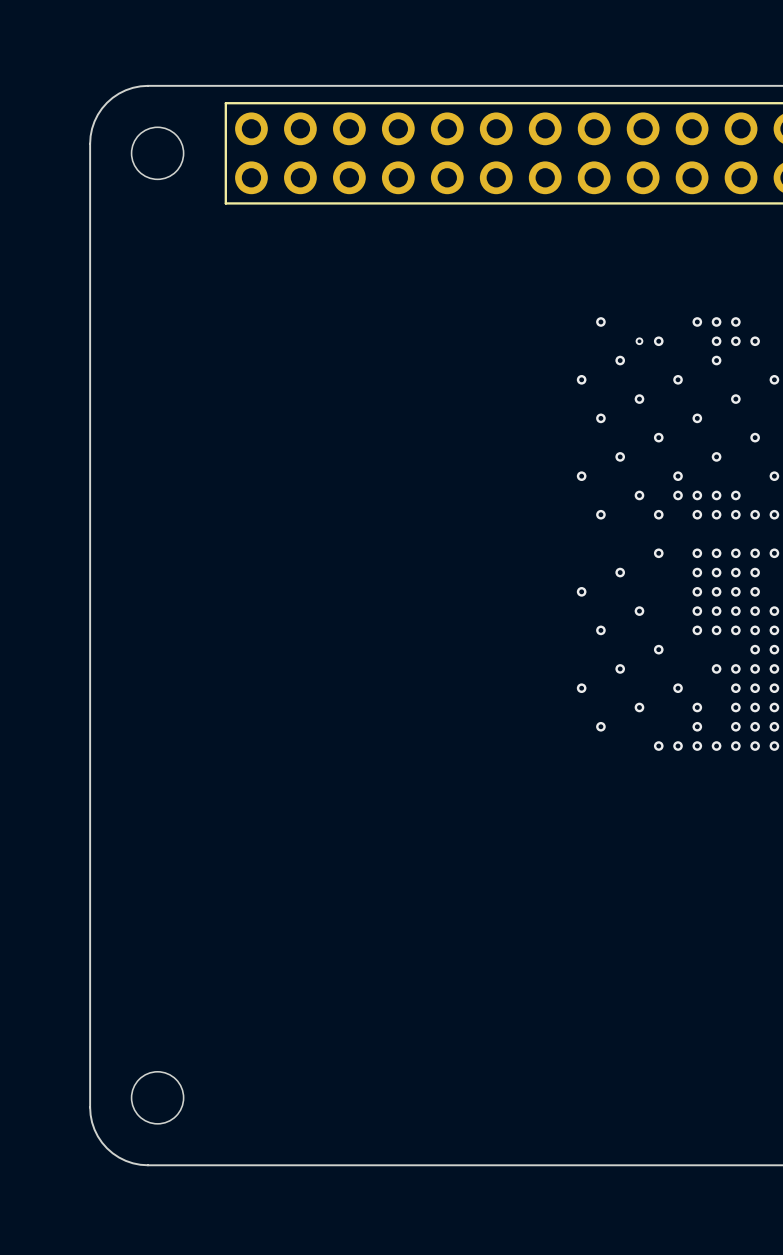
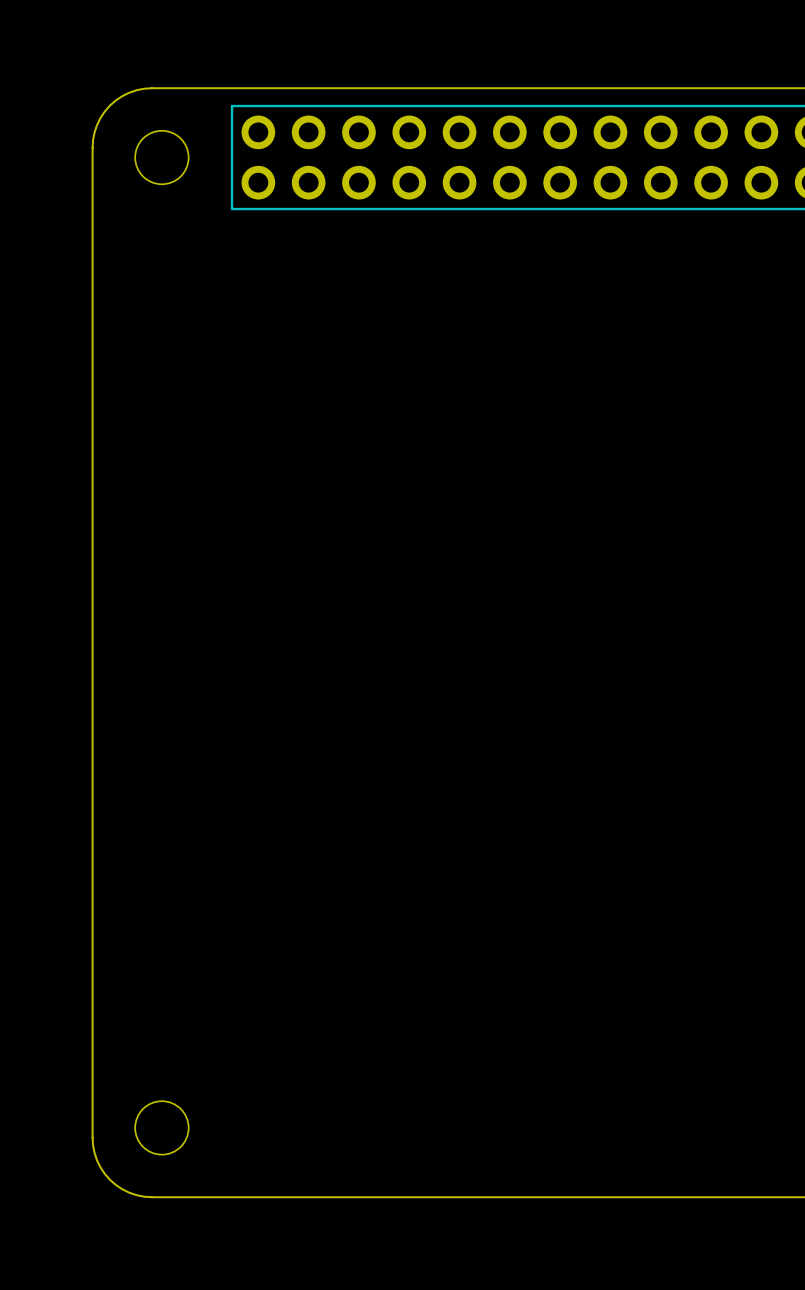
via: (600, 321) -> none
via: (697, 321) -> none
via: (716, 321) -> none
via: (735, 321) -> none
via: (639, 341) -> none
via: (658, 341) -> none
via: (716, 341) -> none
via: (735, 341) -> none
via: (755, 341) -> none
via: (620, 360) -> none
via: (716, 360) -> none
via: (581, 379) -> none
via: (678, 379) -> none
via: (774, 379) -> none
via: (639, 399) -> none
via: (735, 399) -> none
via: (600, 418) -> none
via: (697, 418) -> none
via: (658, 437) -> none
via: (755, 437) -> none
via: (620, 456) -> none
via: (716, 456) -> none
via: (581, 476) -> none
via: (678, 476) -> none
via: (774, 476) -> none
via: (639, 495) -> none
via: (678, 495) -> none
via: (697, 495) -> none
via: (716, 495) -> none
via: (735, 495) -> none
via: (600, 514) -> none
via: (658, 514) -> none
via: (697, 514) -> none
via: (716, 514) -> none
via: (735, 514) -> none
via: (755, 514) -> none
via: (774, 514) -> none
via: (658, 553) -> none
via: (697, 553) -> none
via: (716, 553) -> none
via: (735, 553) -> none
via: (755, 553) -> none
via: (774, 553) -> none
via: (620, 572) -> none
via: (697, 572) -> none
via: (716, 572) -> none
via: (735, 572) -> none
via: (755, 572) -> none
via: (581, 591) -> none
via: (697, 591) -> none
via: (716, 591) -> none
via: (735, 591) -> none
via: (755, 591) -> none
via: (639, 611) -> none
via: (697, 611) -> none
via: (716, 611) -> none
via: (735, 611) -> none
via: (755, 611) -> none
via: (774, 611) -> none
via: (600, 630) -> none
via: (697, 630) -> none
via: (716, 630) -> none
via: (735, 630) -> none
via: (755, 630) -> none
via: (774, 630) -> none
via: (658, 649) -> none
via: (755, 649) -> none
via: (774, 649) -> none
via: (620, 668) -> none
via: (716, 668) -> none
via: (735, 668) -> none
via: (755, 668) -> none
via: (774, 668) -> none
via: (581, 688) -> none
via: (678, 688) -> none
via: (735, 688) -> none
via: (755, 688) -> none
via: (774, 688) -> none
via: (639, 707) -> none
via: (697, 707) -> none
via: (735, 707) -> none
via: (755, 707) -> none
via: (774, 707) -> none
via: (600, 726) -> none
via: (697, 726) -> none
via: (735, 726) -> none
via: (755, 726) -> none
via: (774, 726) -> none
via: (658, 746) -> none
via: (678, 746) -> none
via: (697, 746) -> none
via: (716, 746) -> none
via: (735, 746) -> none
via: (755, 746) -> none
via: (774, 746) -> none

